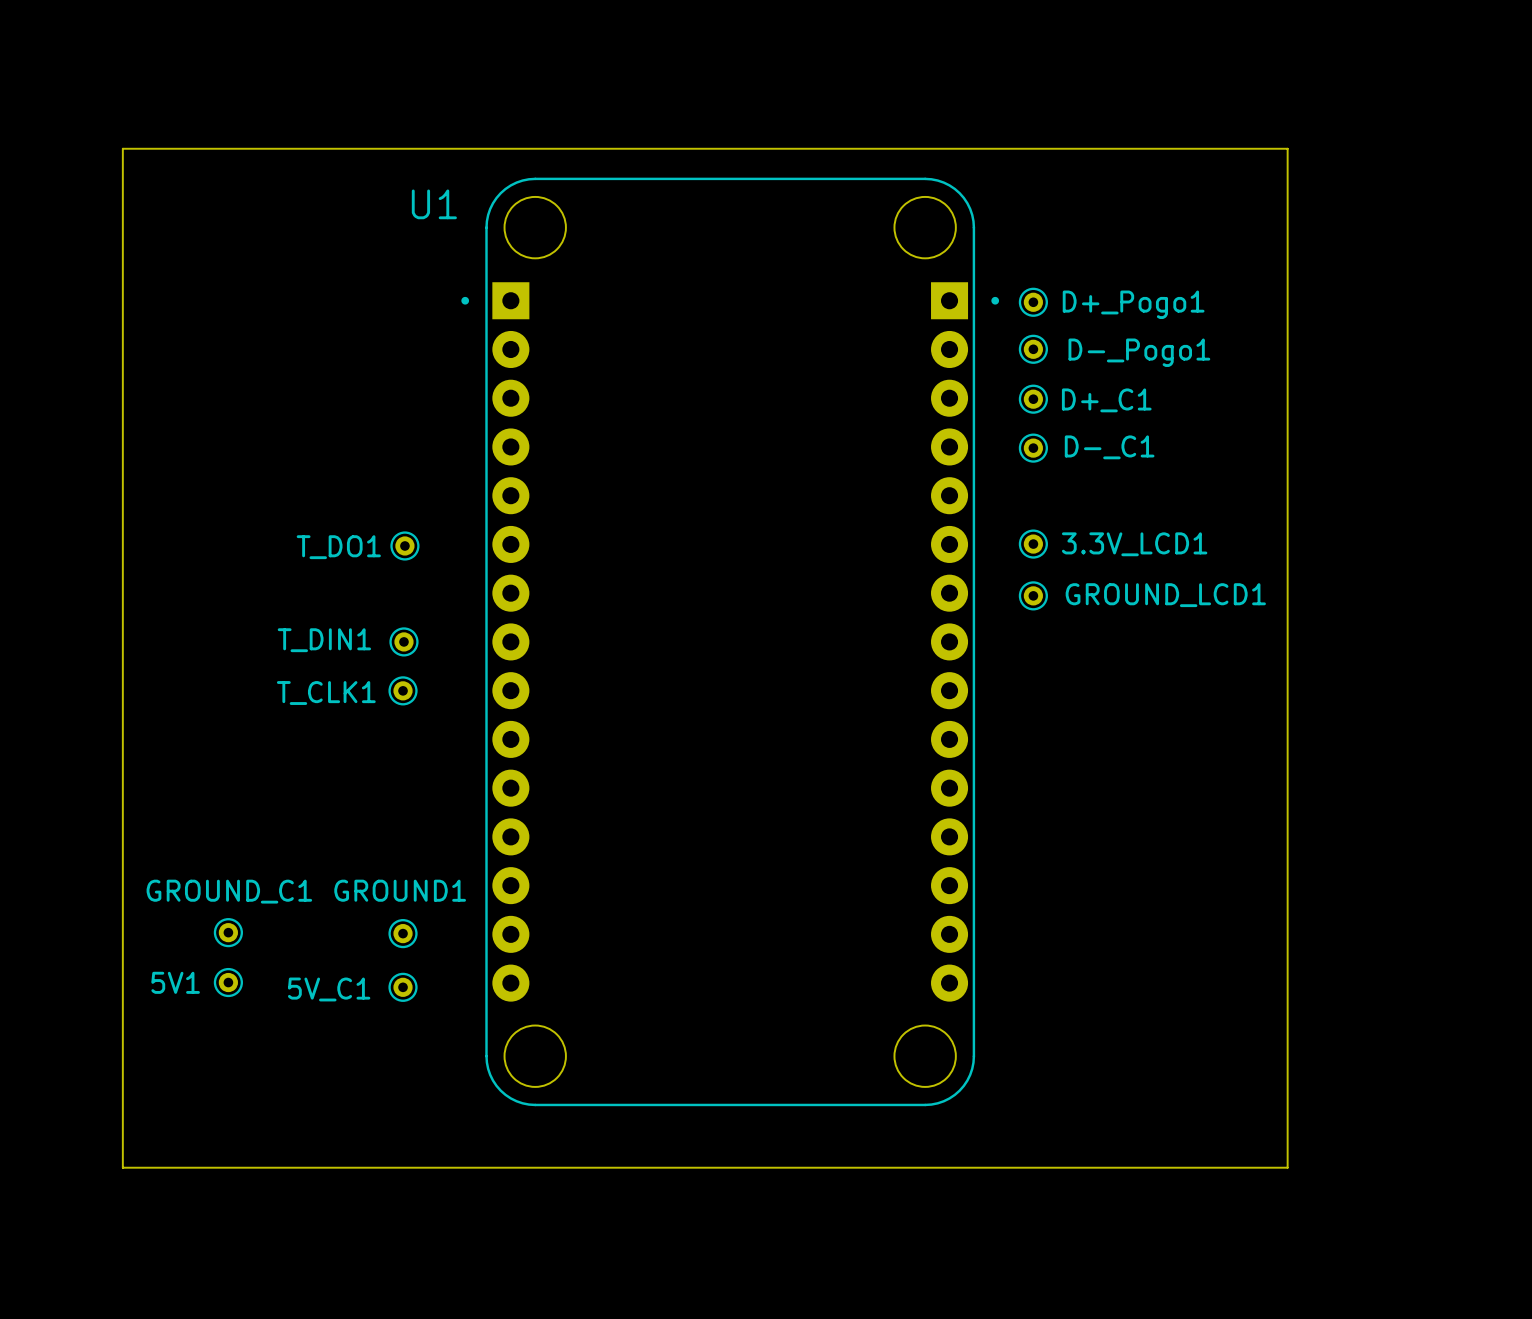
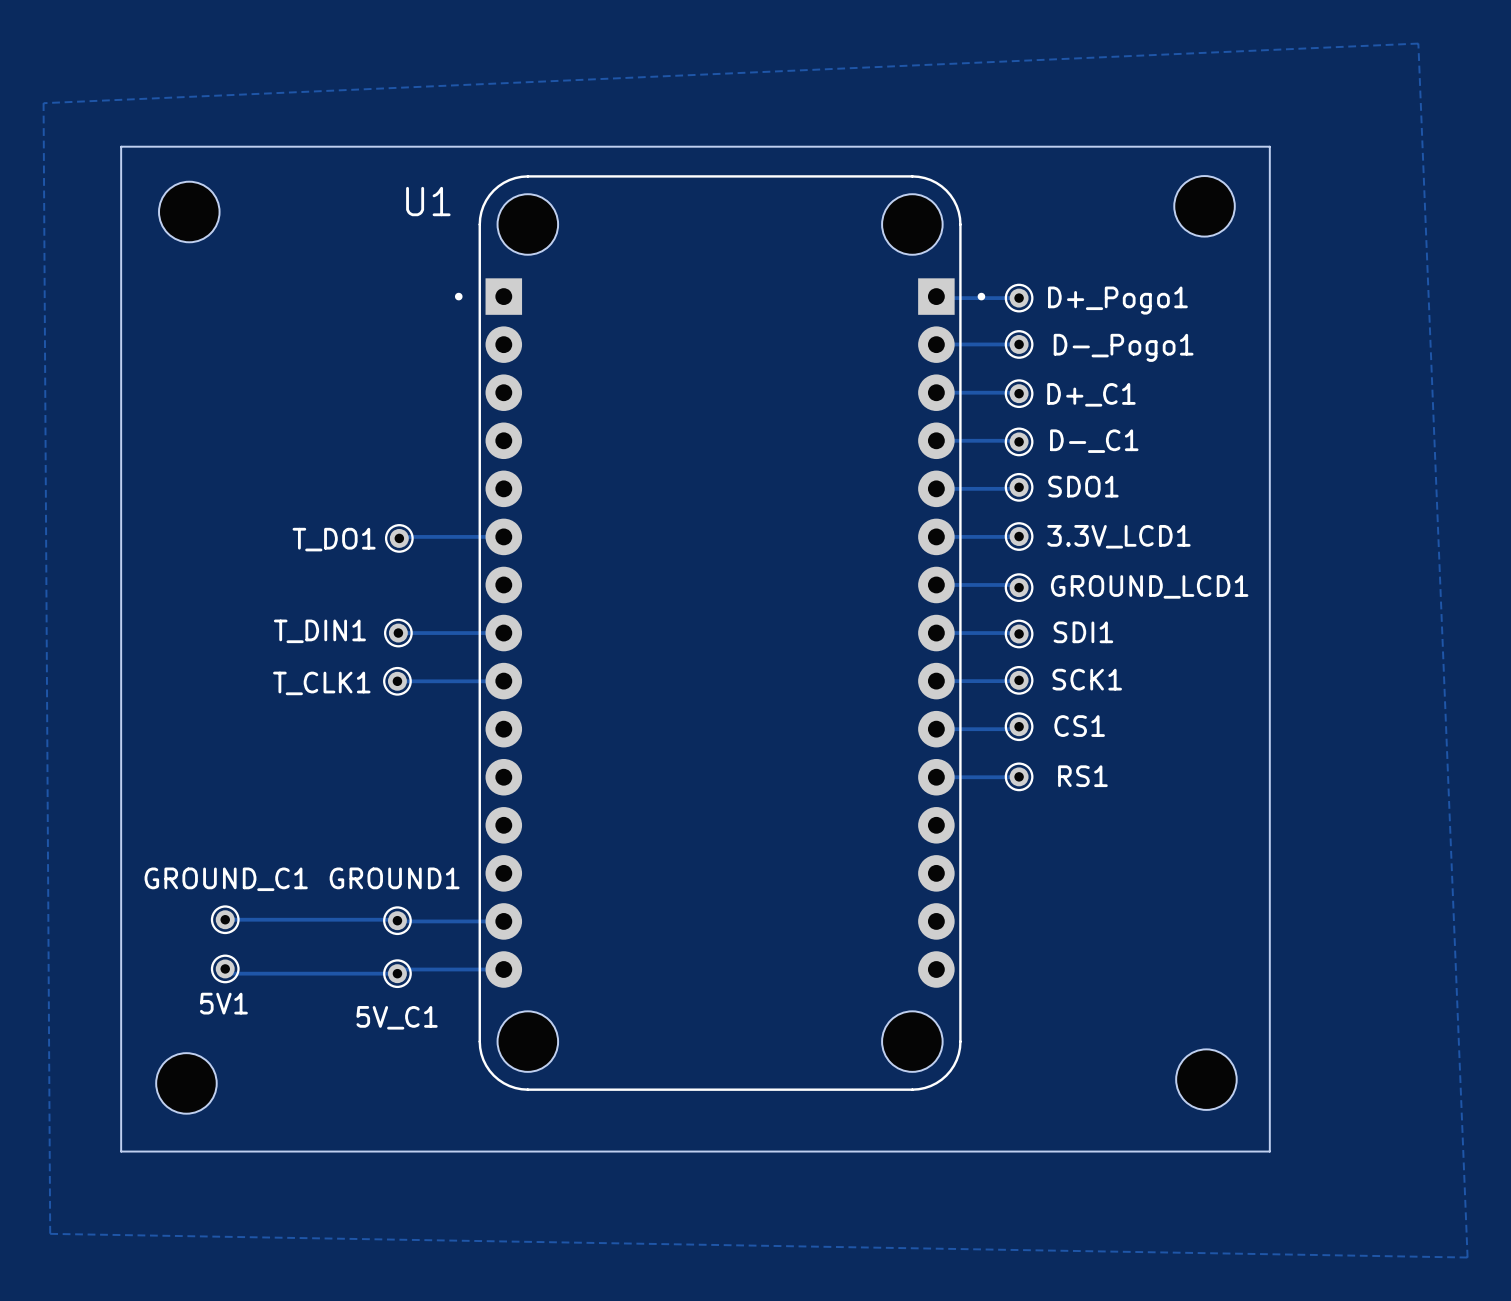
zone outline: none -> (1418, 43) (1467, 1257) (50, 1233) (43, 103) (1418, 43)
part: none -> (1204, 206)
part: none -> (189, 211)
track: none -> (936, 296) (1019, 298)
track: none -> (936, 344) (1019, 344)
track: none -> (936, 392) (1019, 393)
track: none -> (936, 440) (1019, 441)
track: none -> (1019, 487) (936, 488)
SDO1: none -> (1019, 487)
track: none -> (503, 536) (399, 538)
track: none -> (1019, 536) (936, 536)
track: none -> (936, 584) (1016, 584) (1019, 587)
track: none -> (398, 633) (503, 633)
track: none -> (936, 633) (1019, 633)
SDI1: none -> (1019, 633)
track: none -> (1019, 680) (936, 681)
SCK1: none -> (1019, 680)
track: none -> (397, 681) (503, 681)
track: none -> (1019, 726) (1016, 729) (936, 729)
CS1: none -> (1019, 726)
track: none -> (1019, 776) (936, 777)
RS1: none -> (1019, 776)
track: none -> (225, 919) (503, 921)
5V1 name position: 5V1 (175, 982) -> 5V1 (223, 1003)
track: none -> (225, 968) (229, 973) (397, 973) (401, 969) (503, 969)
5V_C1 name position: 5V_C1 (329, 989) -> 5V_C1 (397, 1017)
part: none -> (1206, 1079)
part: none -> (186, 1083)

